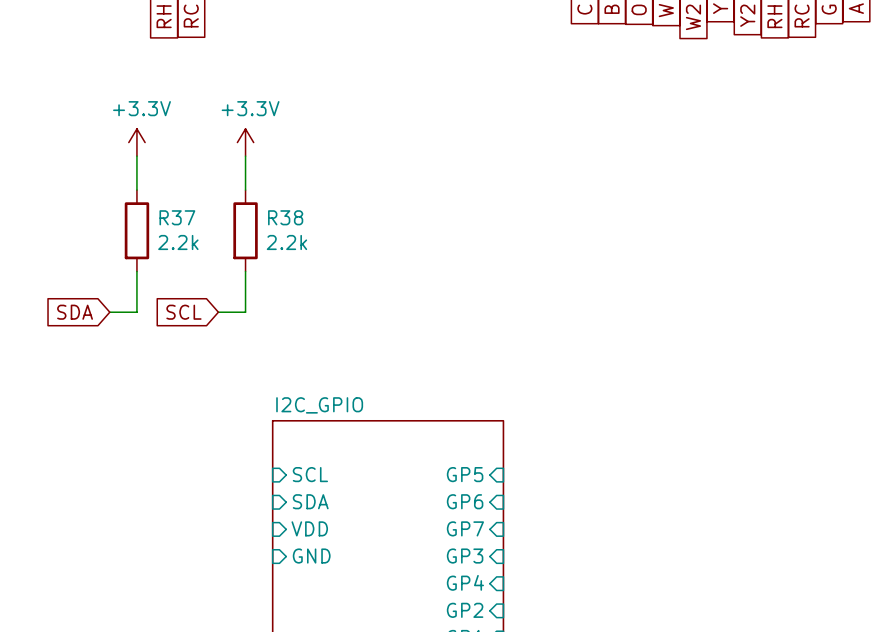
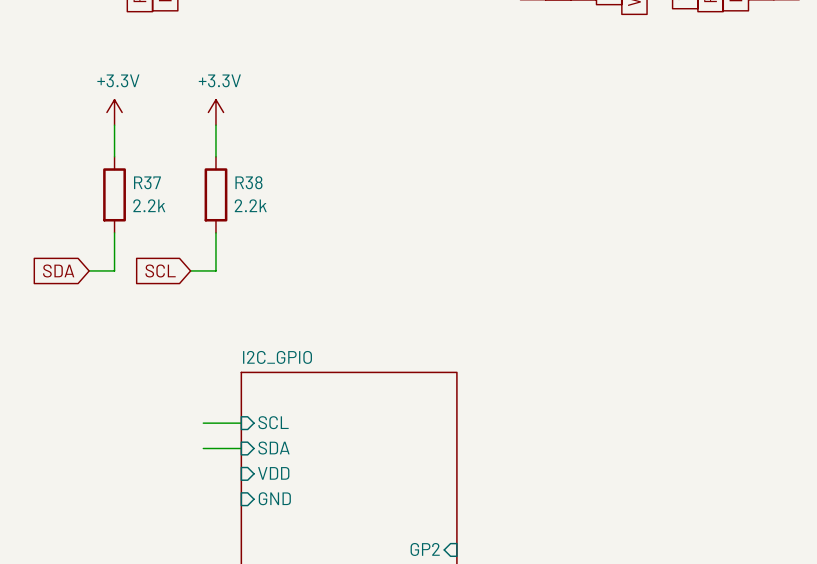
sheet pin: GP5 (465, 474) -> none
wire: none -> (203, 423) (241, 423)
sheet pin: GP6 (465, 501) -> none
wire: none -> (203, 448) (241, 448)
sheet pin: GP7 (465, 528) -> none
sheet pin: GP3 (465, 556) -> none
sheet pin: GP4 (465, 582) -> none

